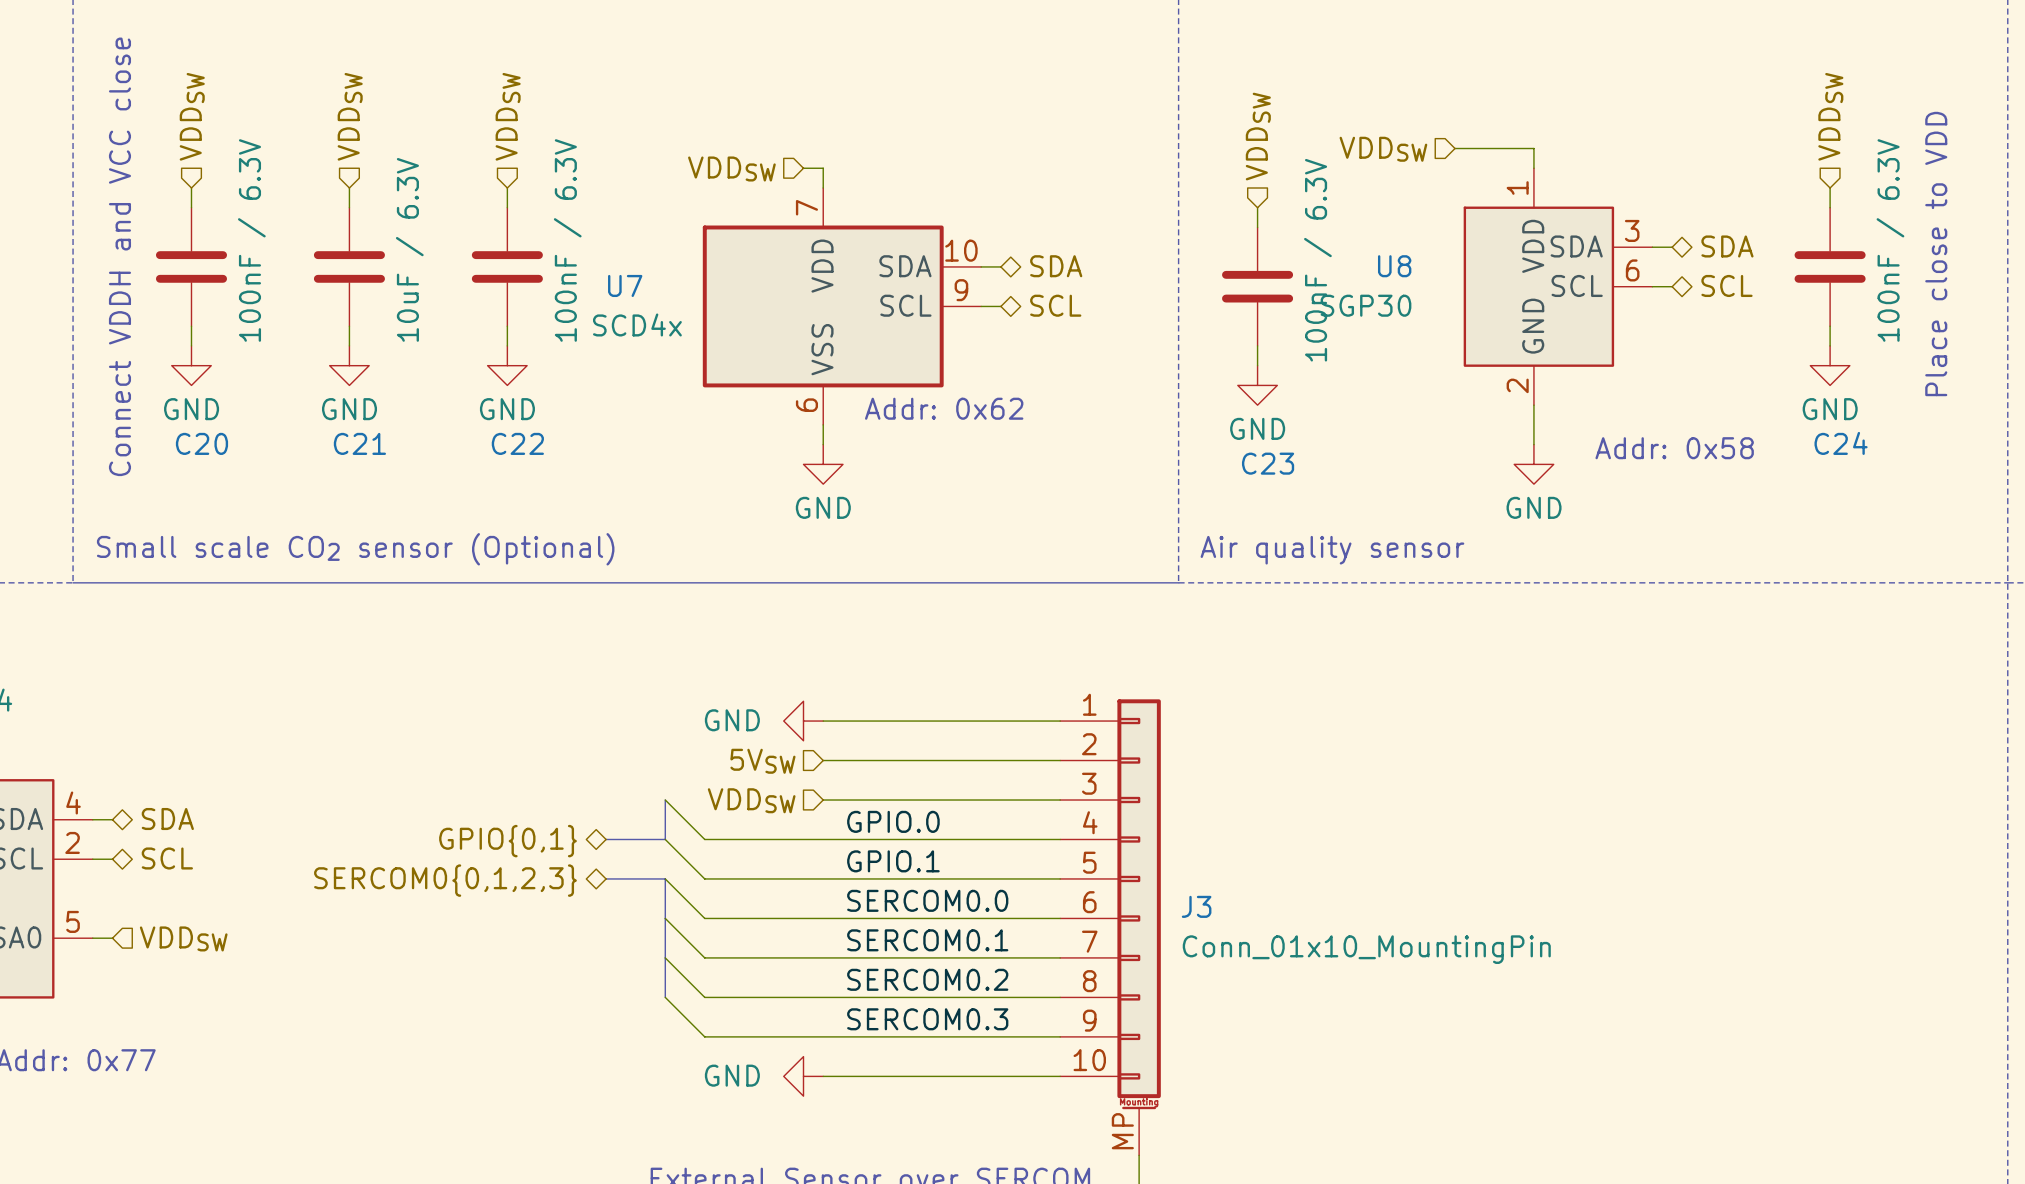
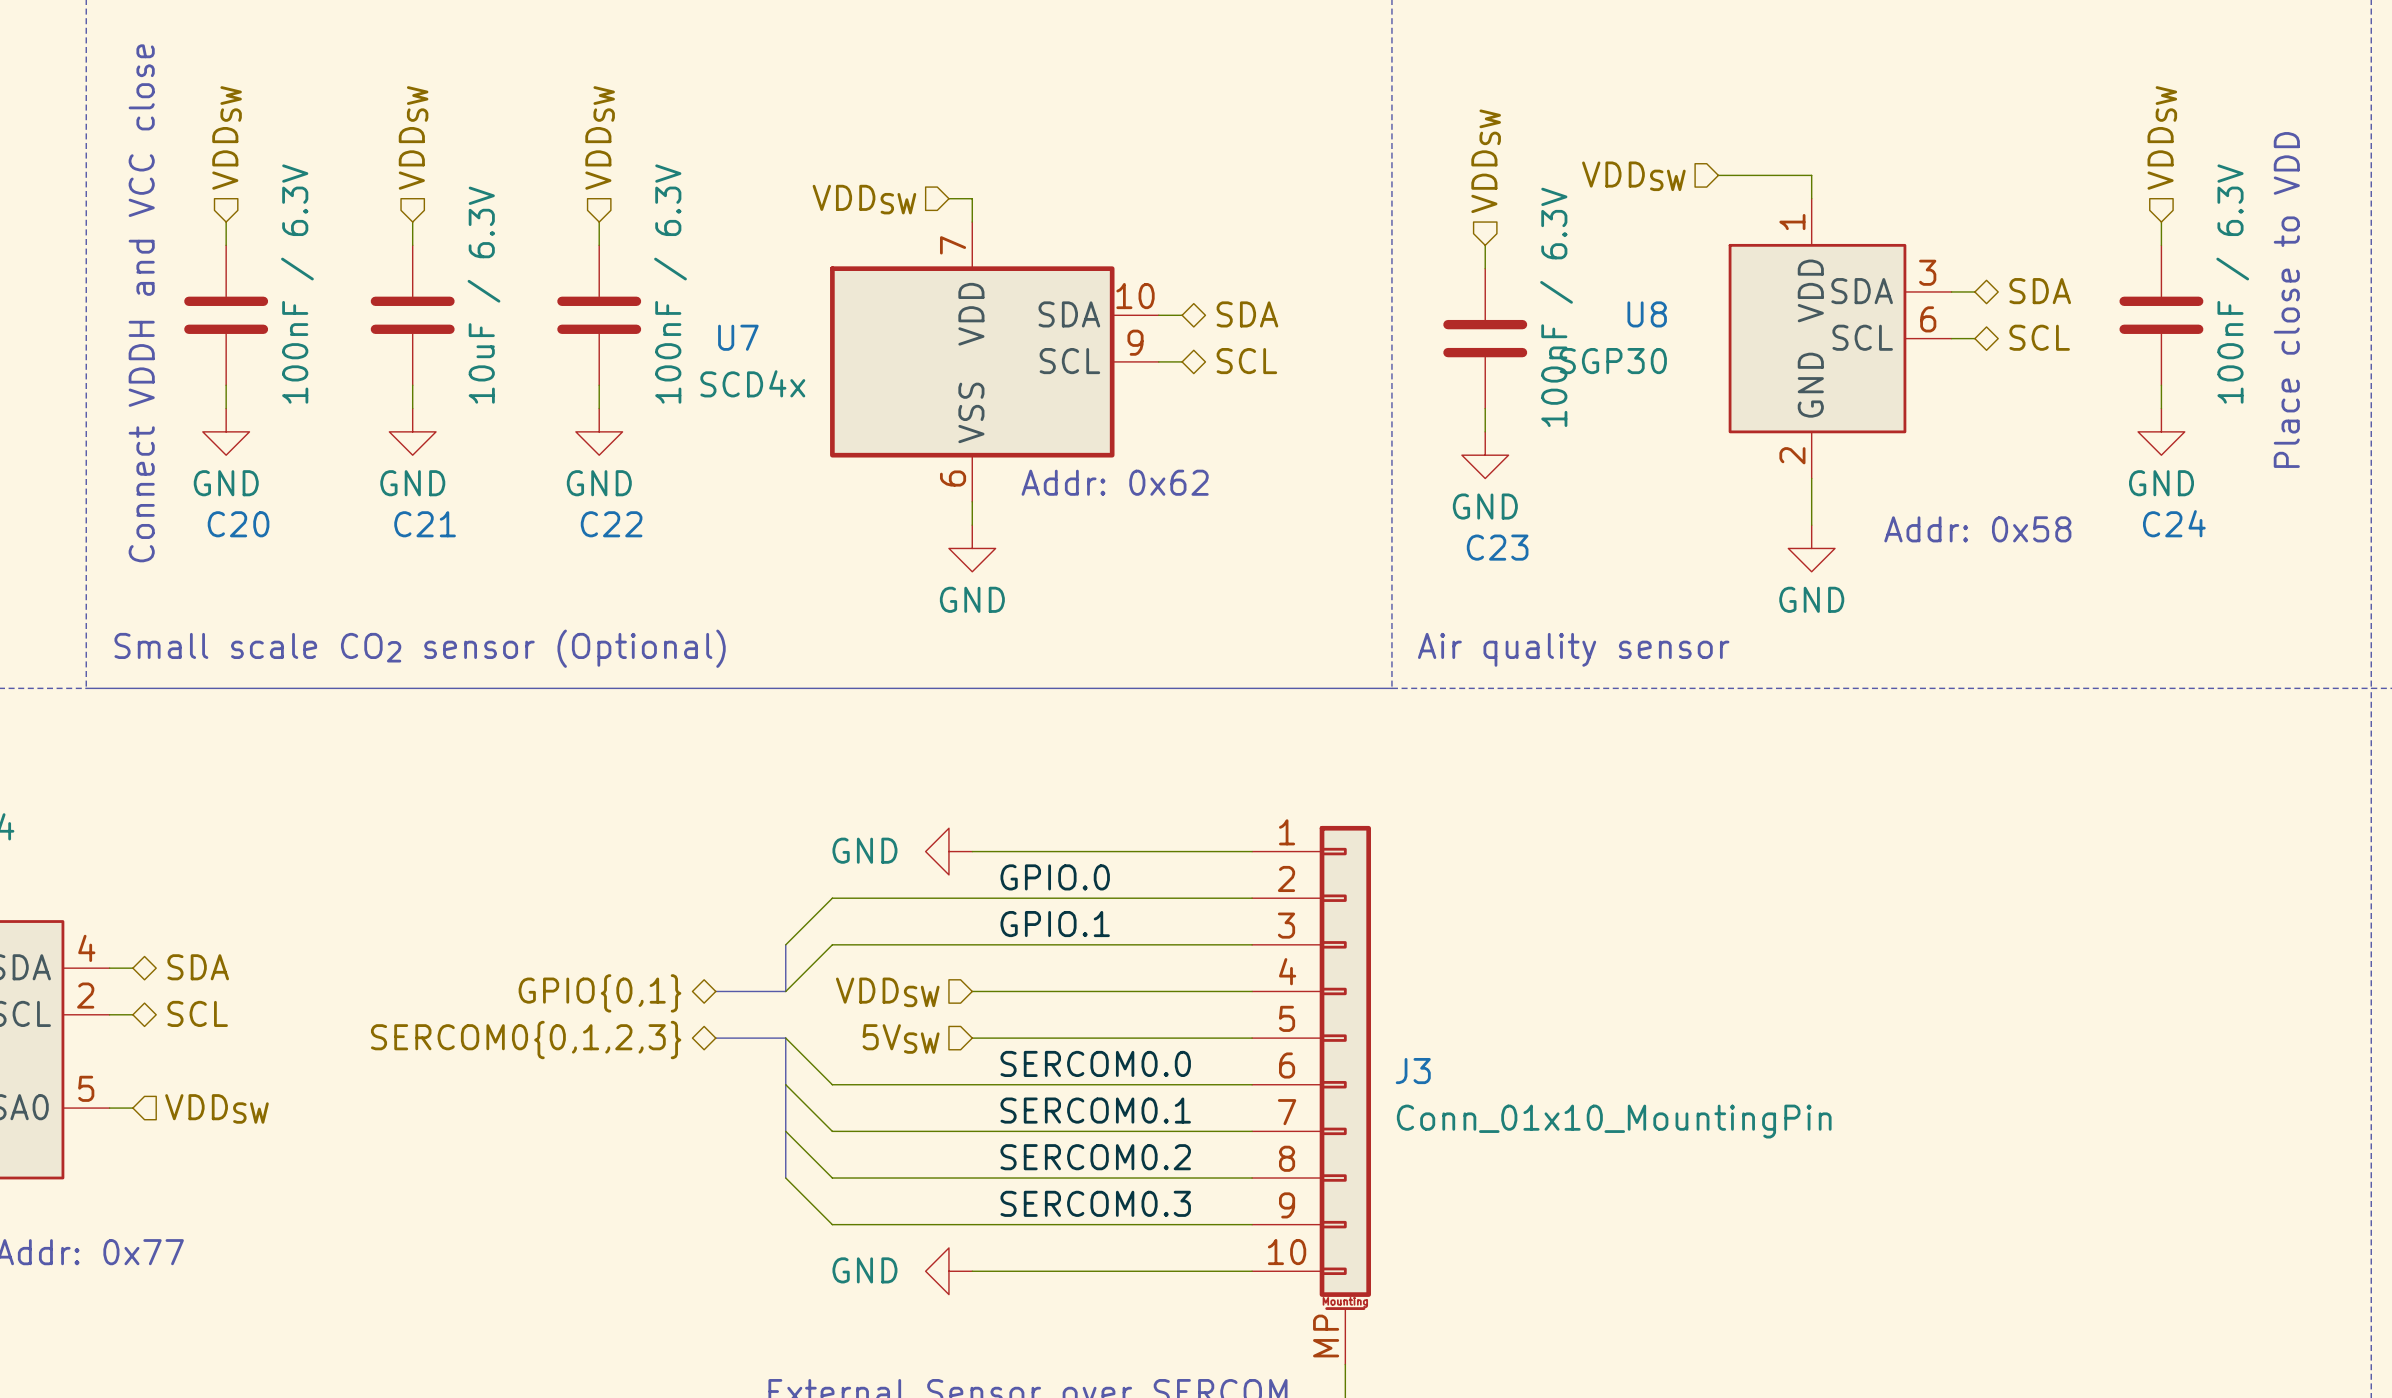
hierarchical label position: 5VSW (762, 761) -> 5VSW (901, 1038)
wire: (665, 800) (704, 839) (823, 839) -> (785, 944) (832, 898) (972, 898)
hierarchical label position: VDDSW (751, 800) -> VDDSW (887, 992)
label position: GPIO.0 (893, 821) -> GPIO.0 (1055, 877)
wire: (665, 839) (704, 878) (823, 878) -> (785, 991) (832, 944) (972, 944)
label position: GPIO.1 (893, 861) -> GPIO.1 (1055, 924)

